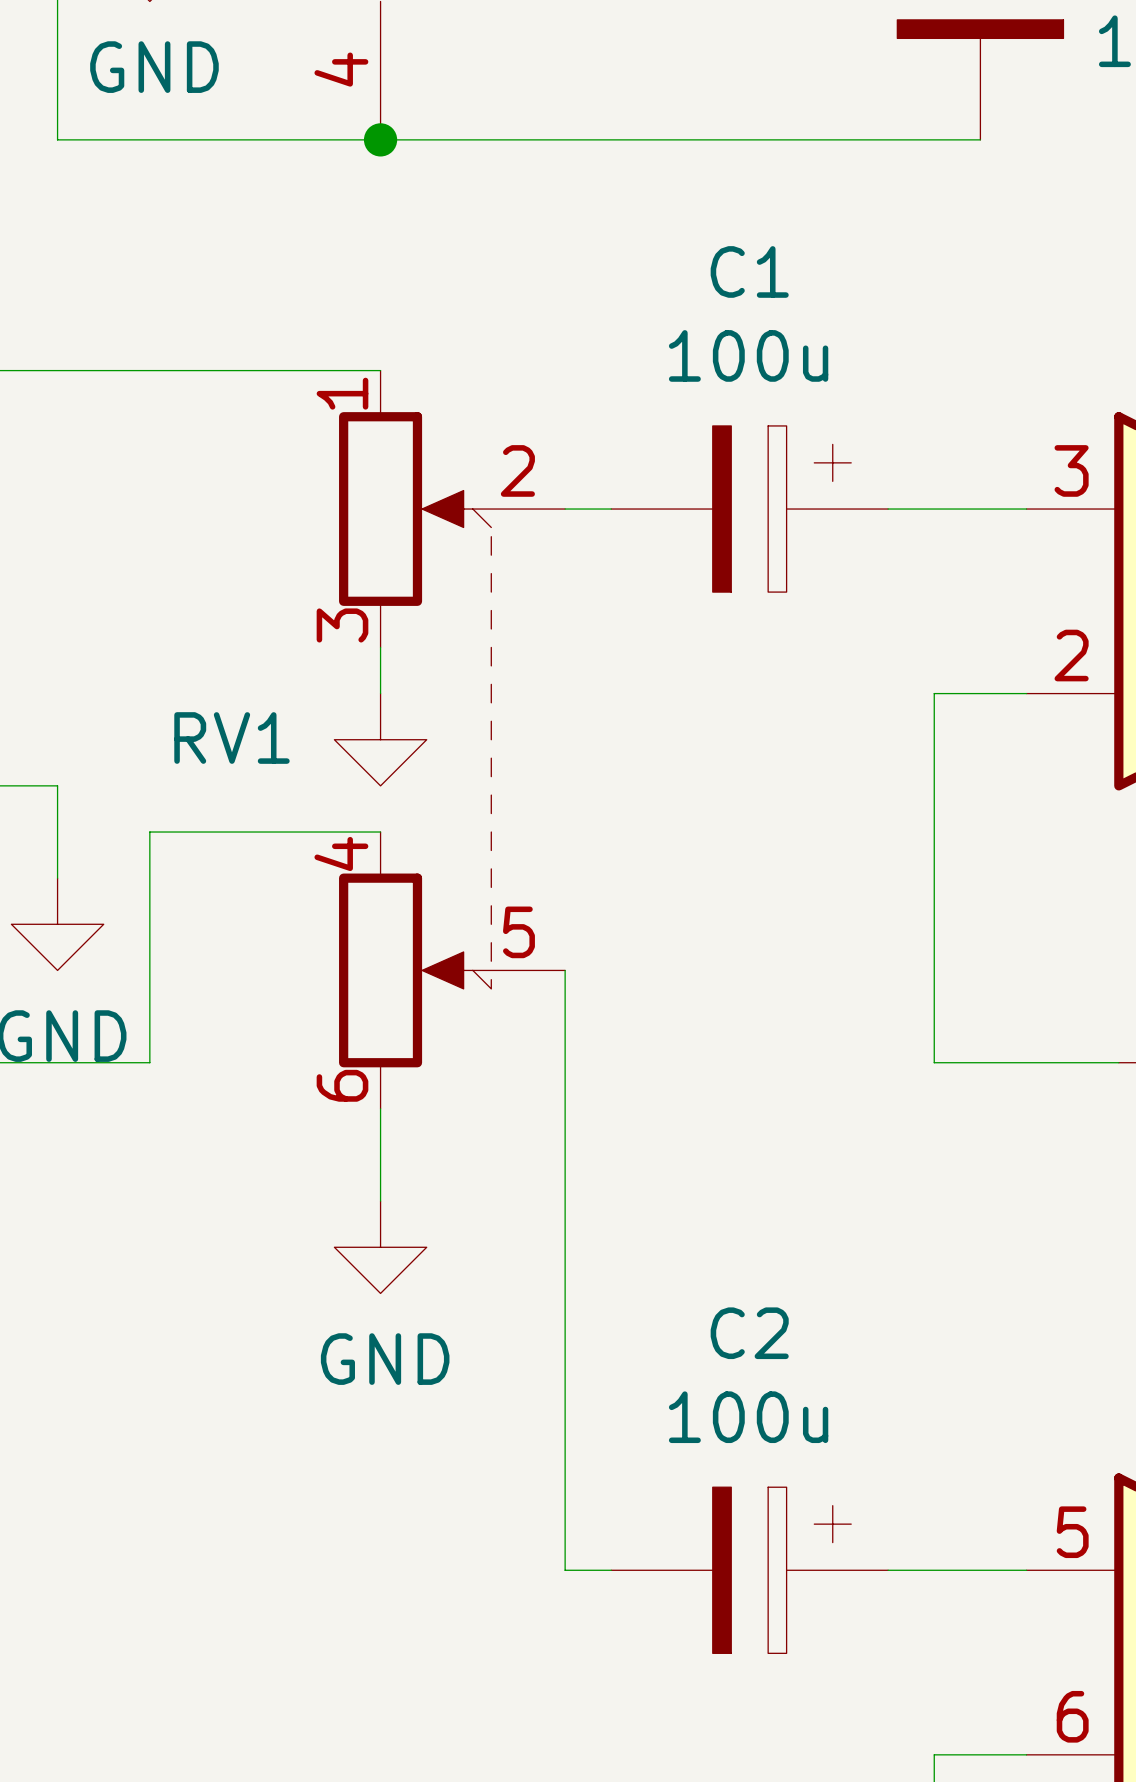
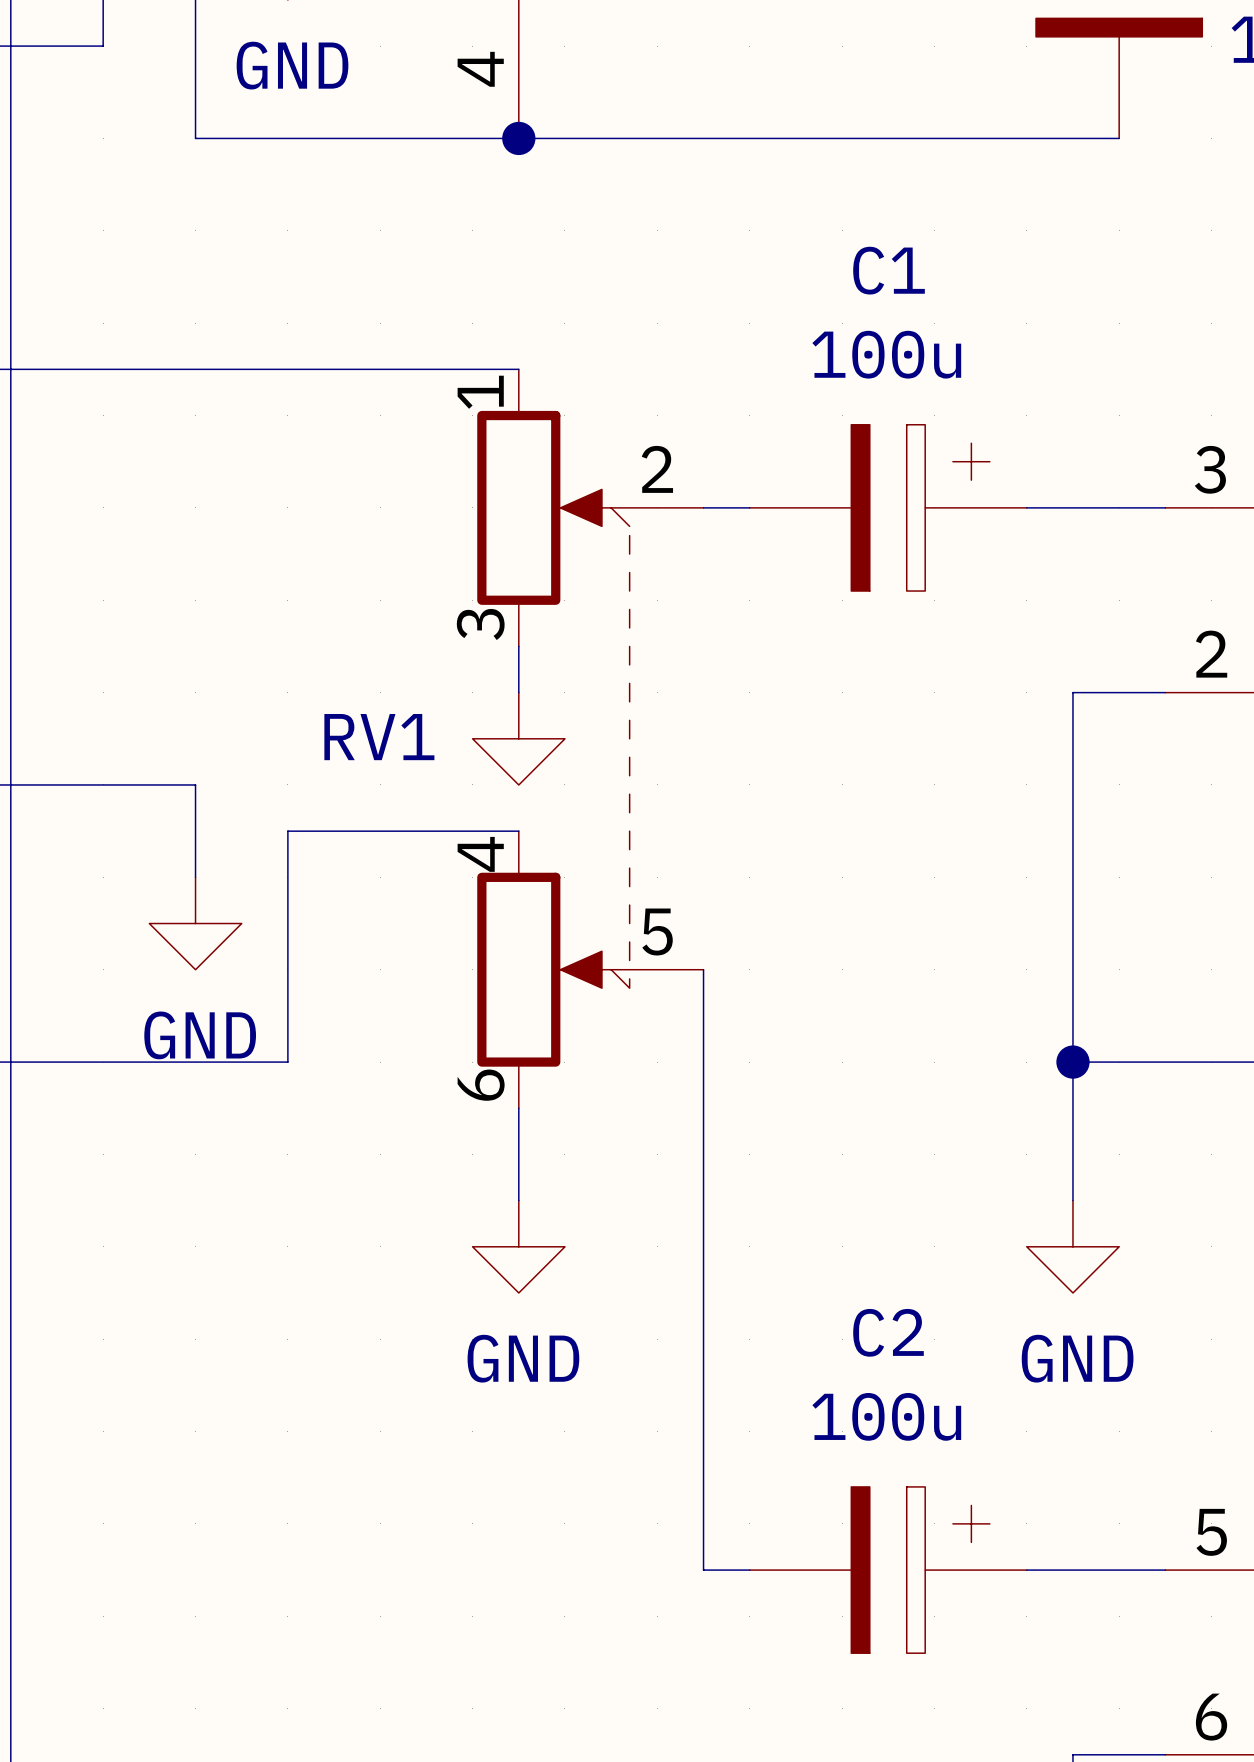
wire: none -> (1072, 1062) (1072, 1200)
junction: none -> (1072, 1062)
power symbol: none -> GND (1072, 1246)

